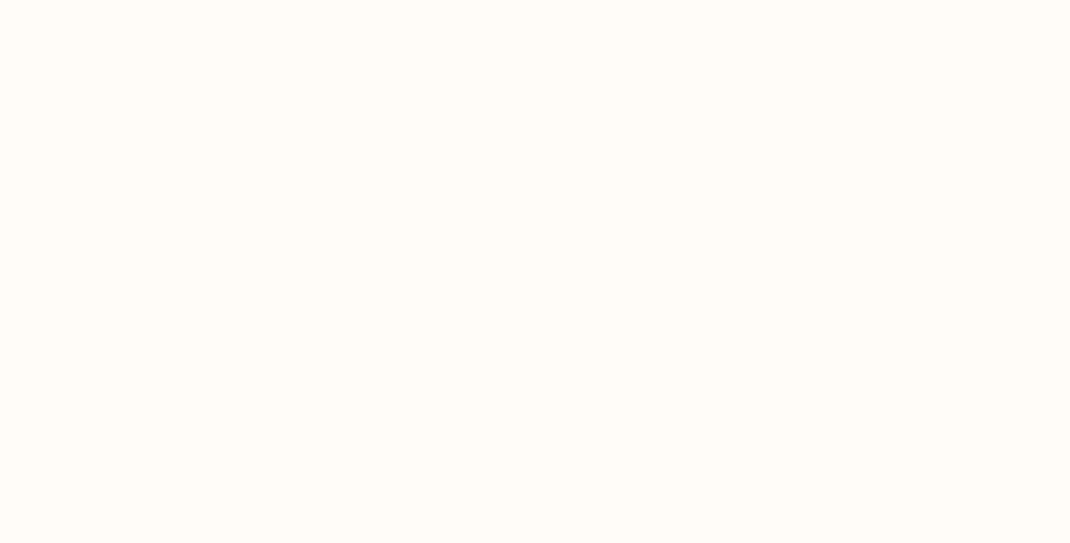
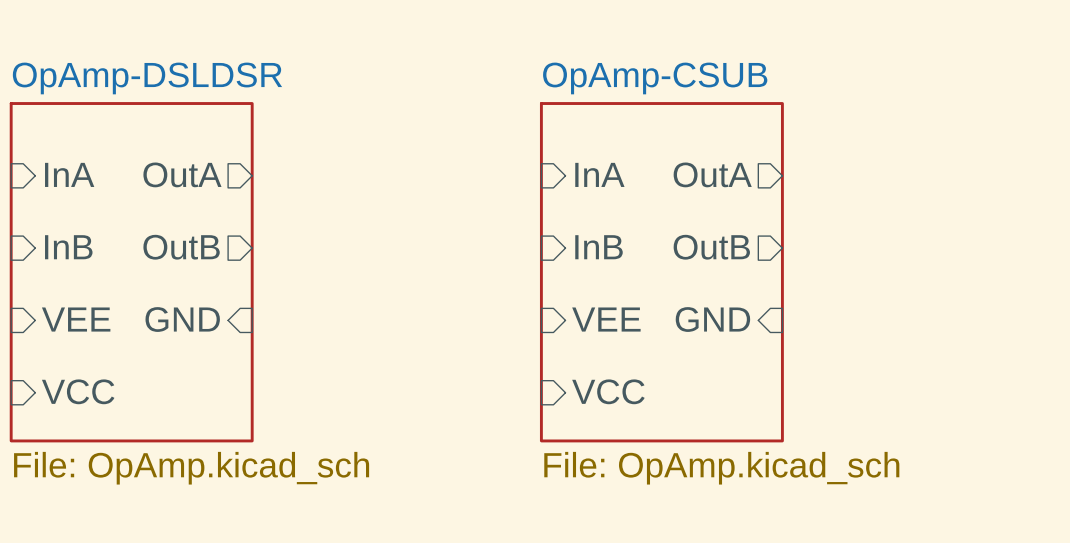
sheet pin: none -> InA (69, 174)
sheet pin: none -> OutA (182, 174)
sheet pin: none -> InA (599, 174)
sheet pin: none -> OutA (712, 174)
sheet pin: none -> InB (68, 247)
sheet pin: none -> OutB (181, 247)
sheet pin: none -> InB (599, 247)
sheet pin: none -> OutB (711, 247)
sheet OpAmp-DSLDSR: none -> File: OpAmp.kicad_sch (131, 272)
sheet OpAmp-CSUB: none -> File: OpAmp.kicad_sch (661, 272)
sheet pin: none -> VEE (76, 319)
sheet pin: none -> GND (182, 319)
sheet pin: none -> VEE (606, 319)
sheet pin: none -> GND (712, 319)
sheet pin: none -> VCC (78, 391)
sheet pin: none -> VCC (608, 391)

